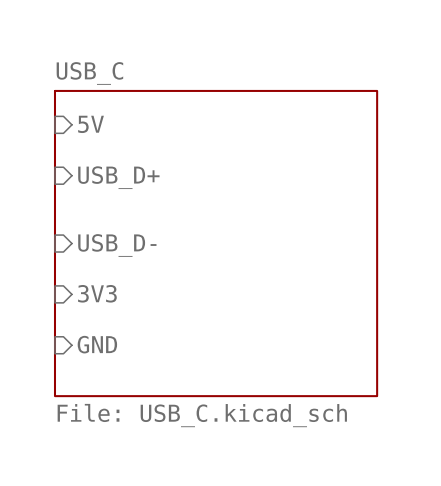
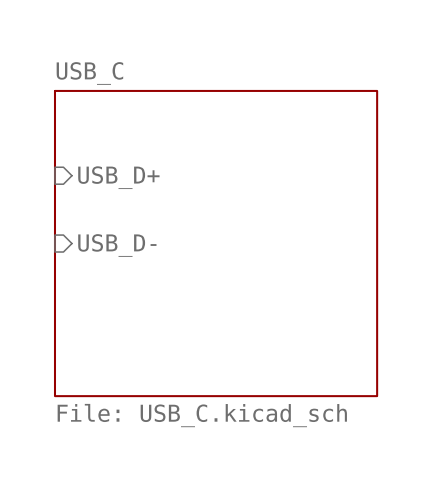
sheet pin: 5V (91, 124) -> none
sheet pin: 3V3 (97, 293) -> none
sheet pin: GND (97, 344) -> none

